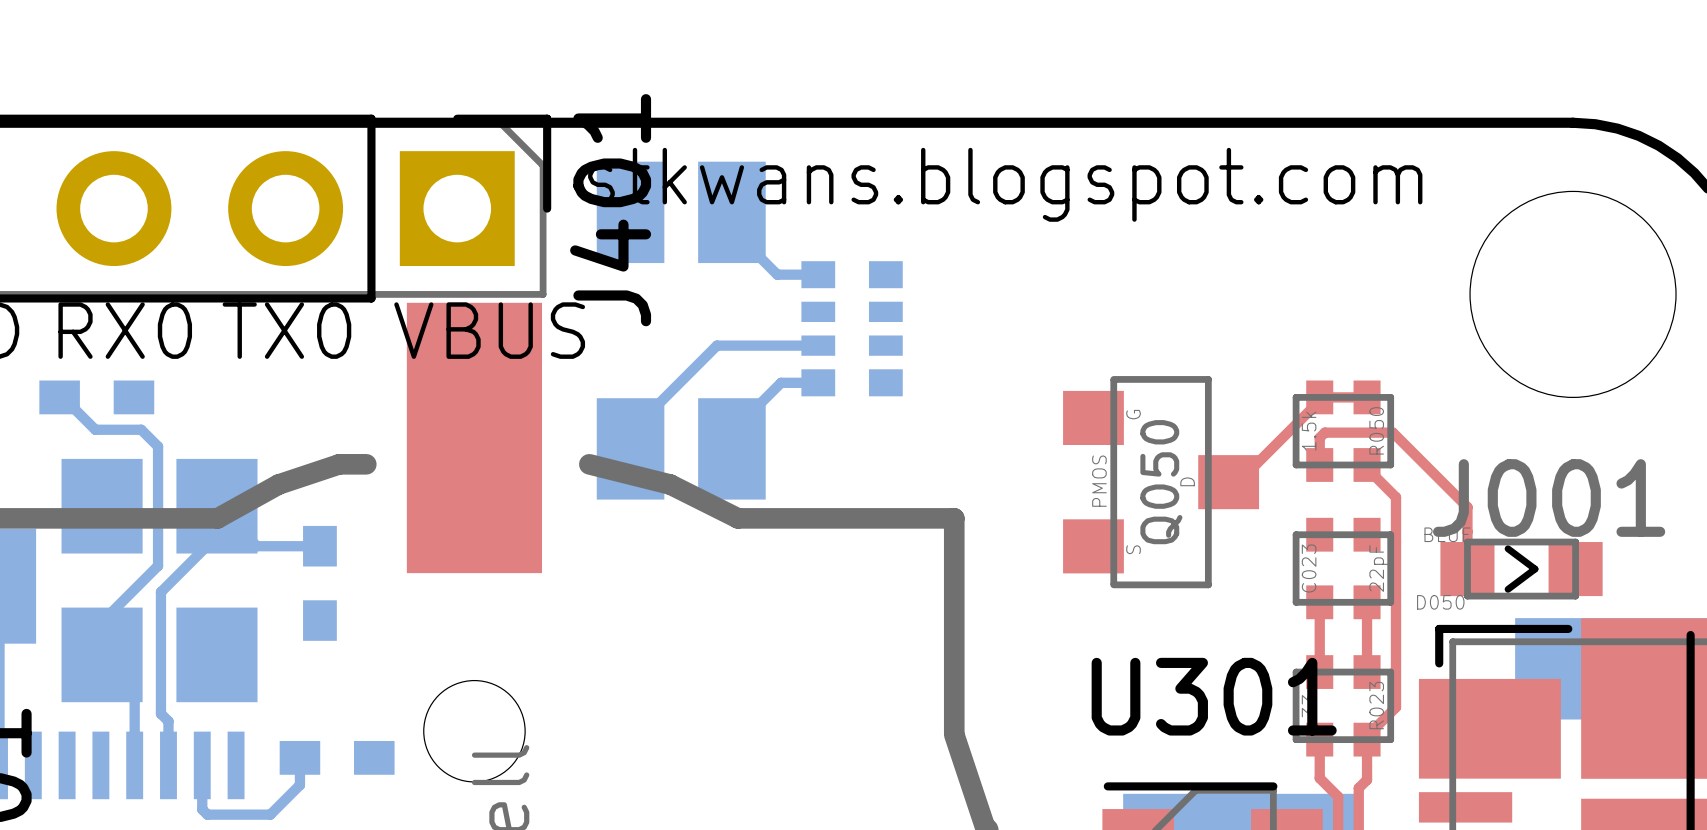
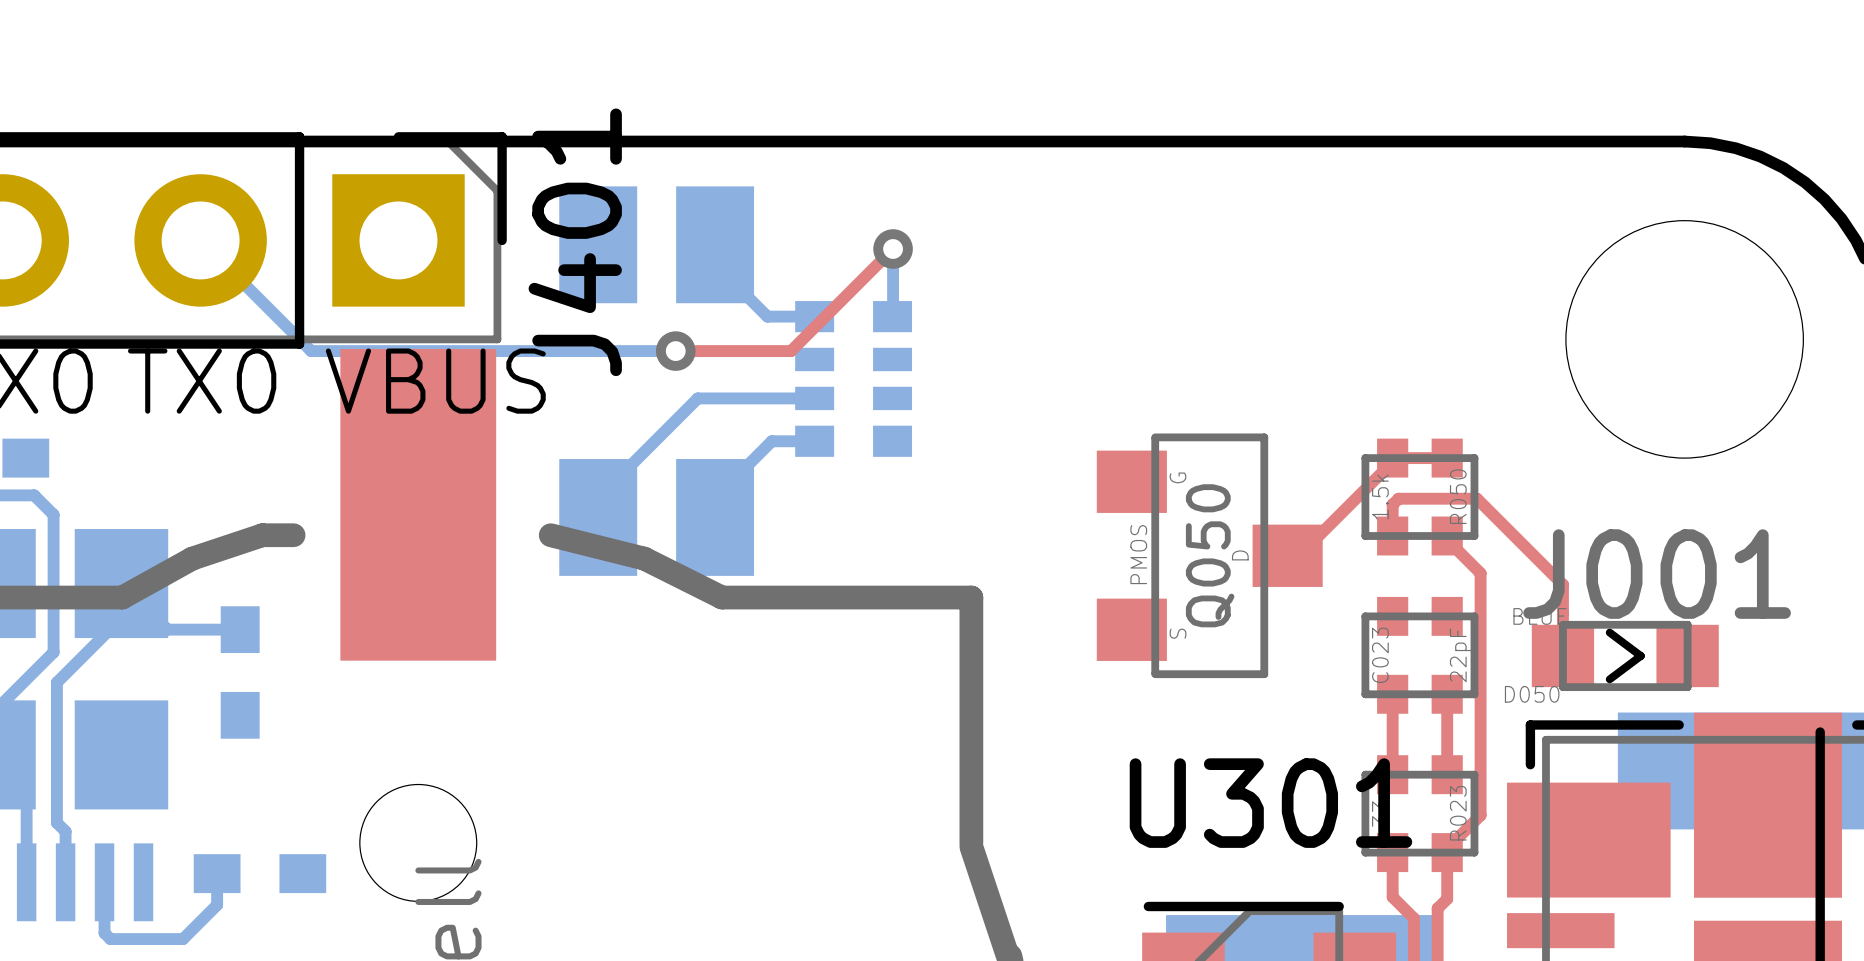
text: stkwans.blogspot.com (1005, 184) -> none
bottom track: none -> (200, 240) (311, 351) (675, 351)
top track: none -> (893, 249) (790, 351) (675, 351)
bottom track: none -> (893, 249) (893, 316)
via: none -> (893, 249)
via: none -> (675, 351)

